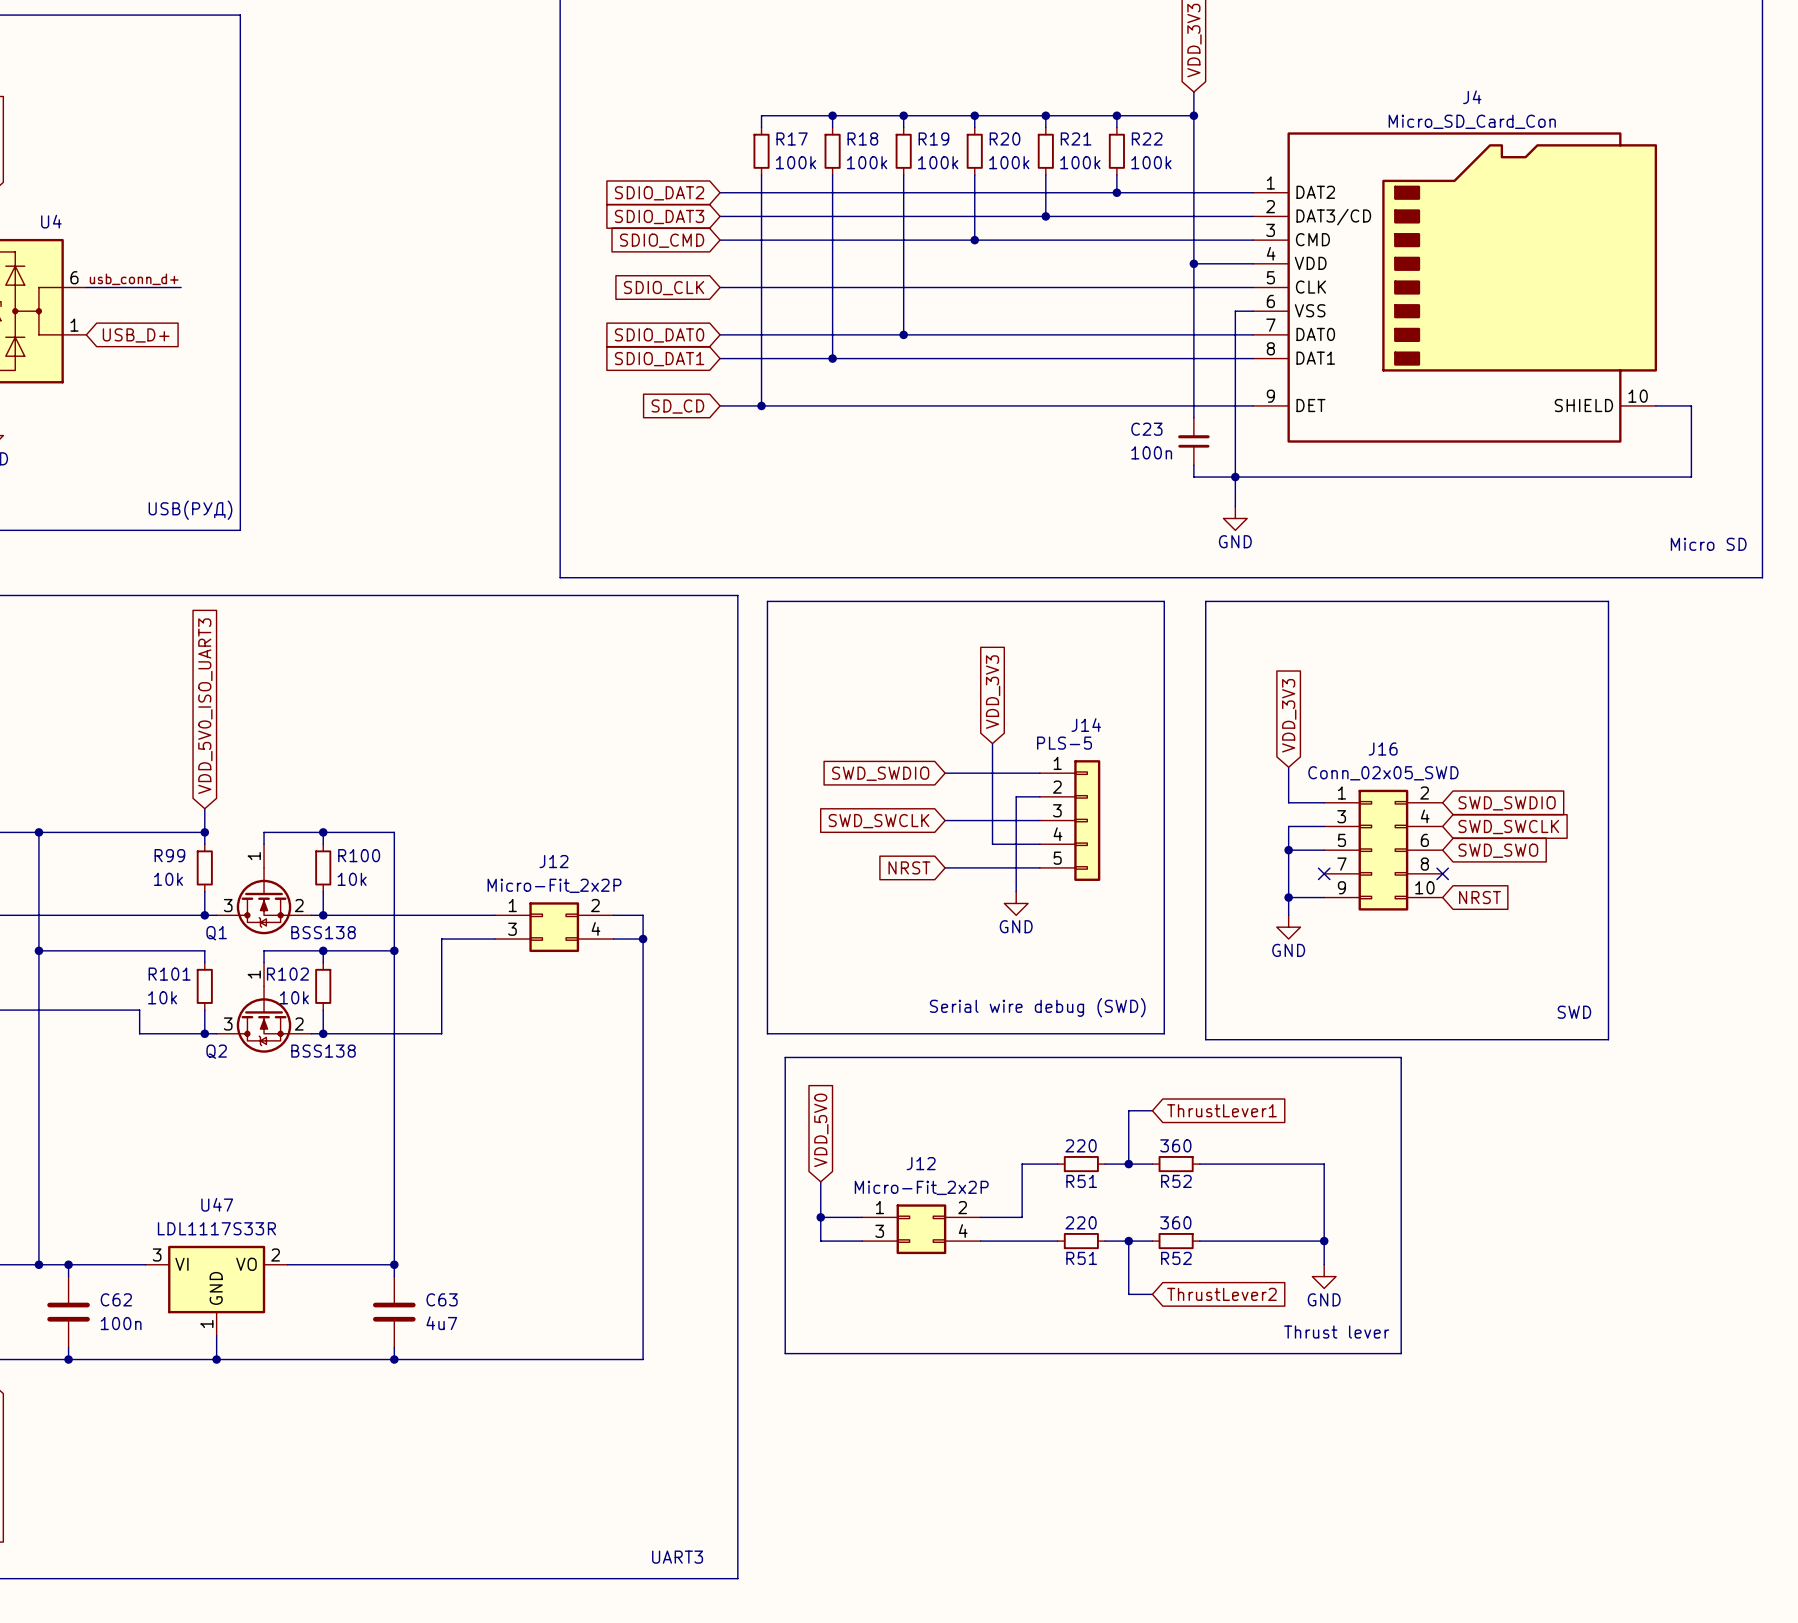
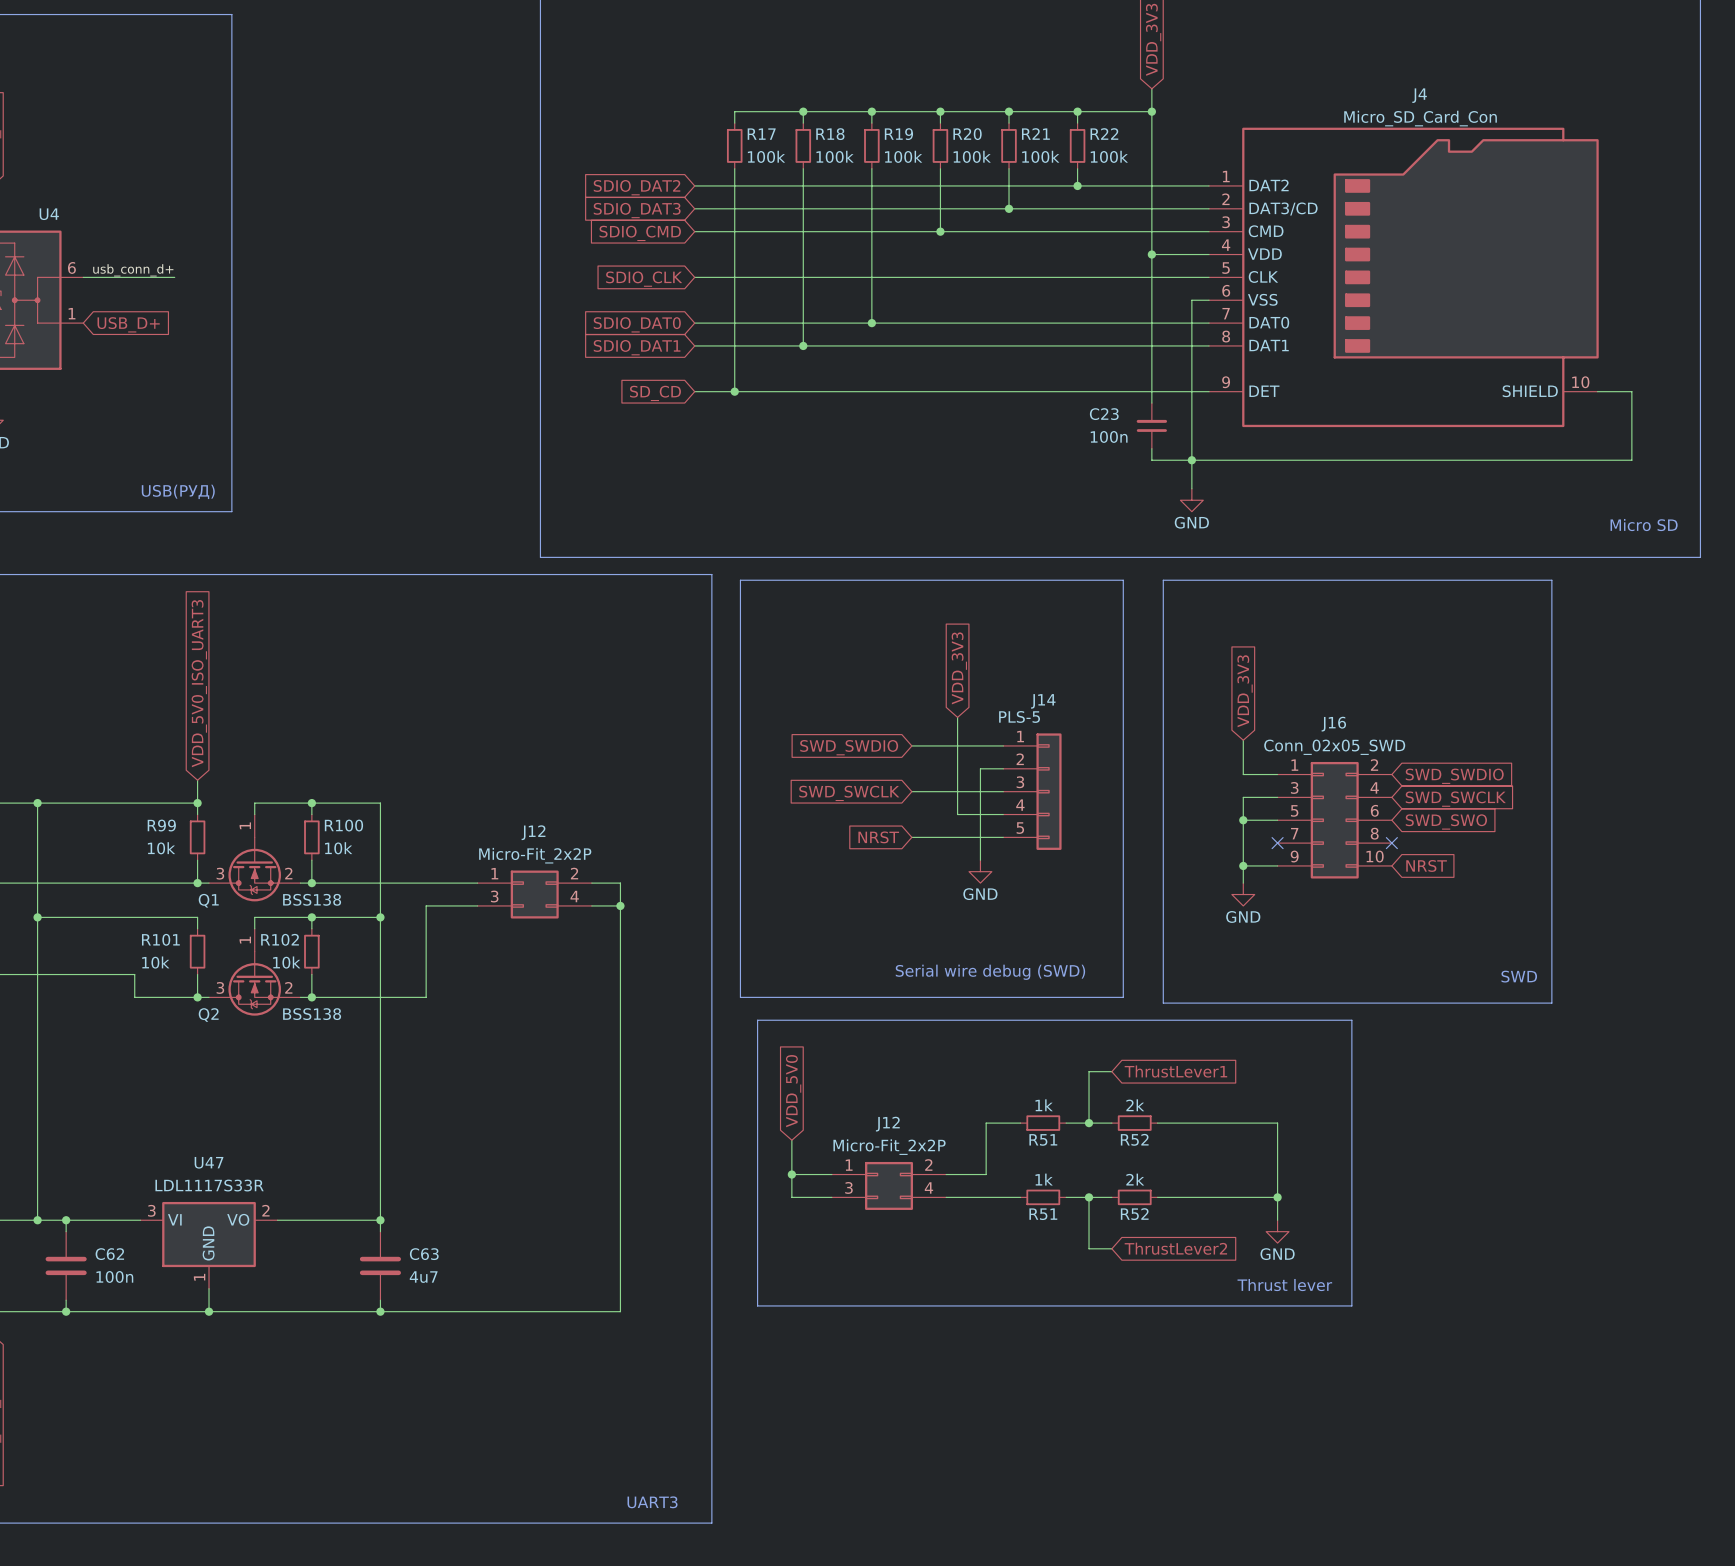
R51 value: 220 (1081, 1145) -> 1k (1044, 1105)
R52 value: 360 (1175, 1145) -> 2k (1135, 1105)
R51 value: 220 (1081, 1222) -> 1k (1044, 1179)
R52 value: 360 (1175, 1222) -> 2k (1135, 1179)

